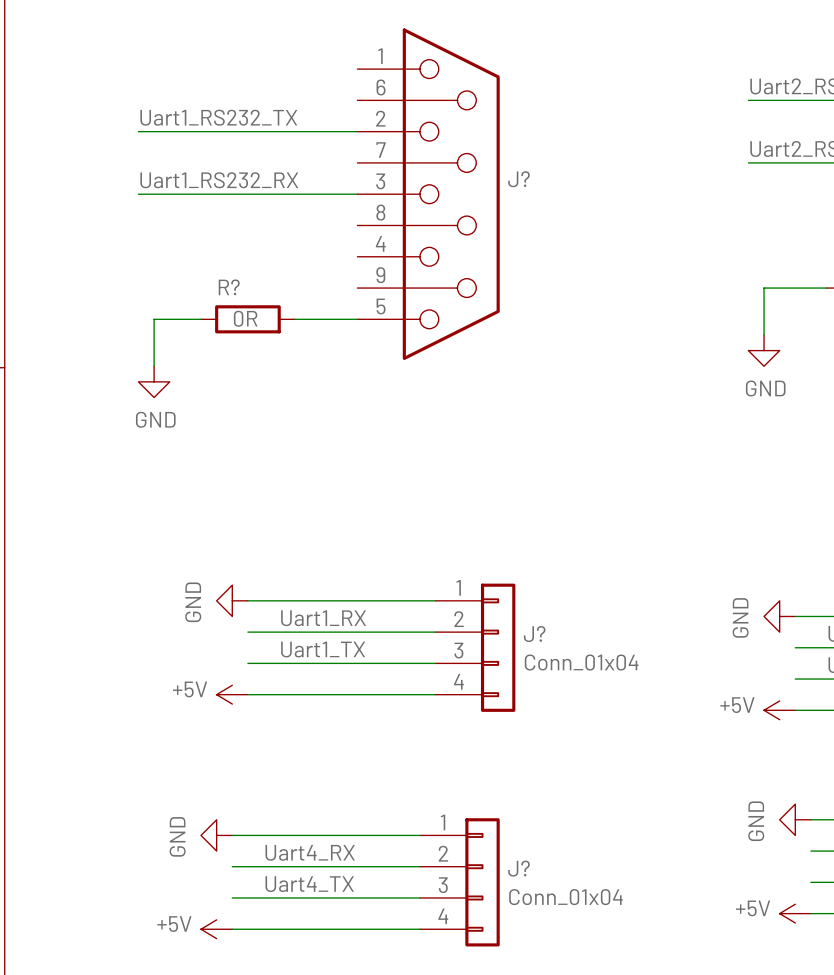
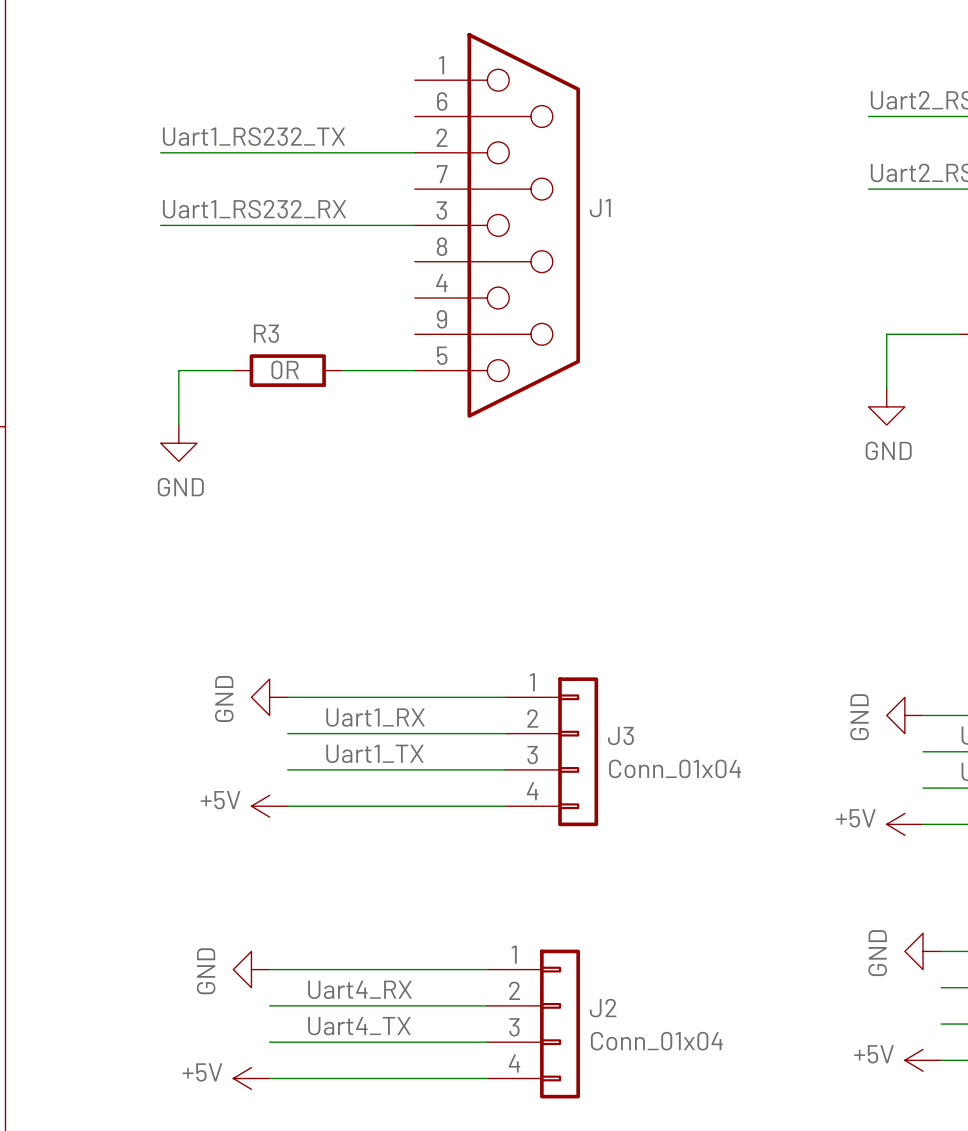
J? name: J? (518, 179) -> J1 (600, 208)
R? name: R? (229, 287) -> R3 (266, 333)
J? name: J? (534, 634) -> J3 (620, 735)
J? name: J? (518, 868) -> J2 (603, 1008)

